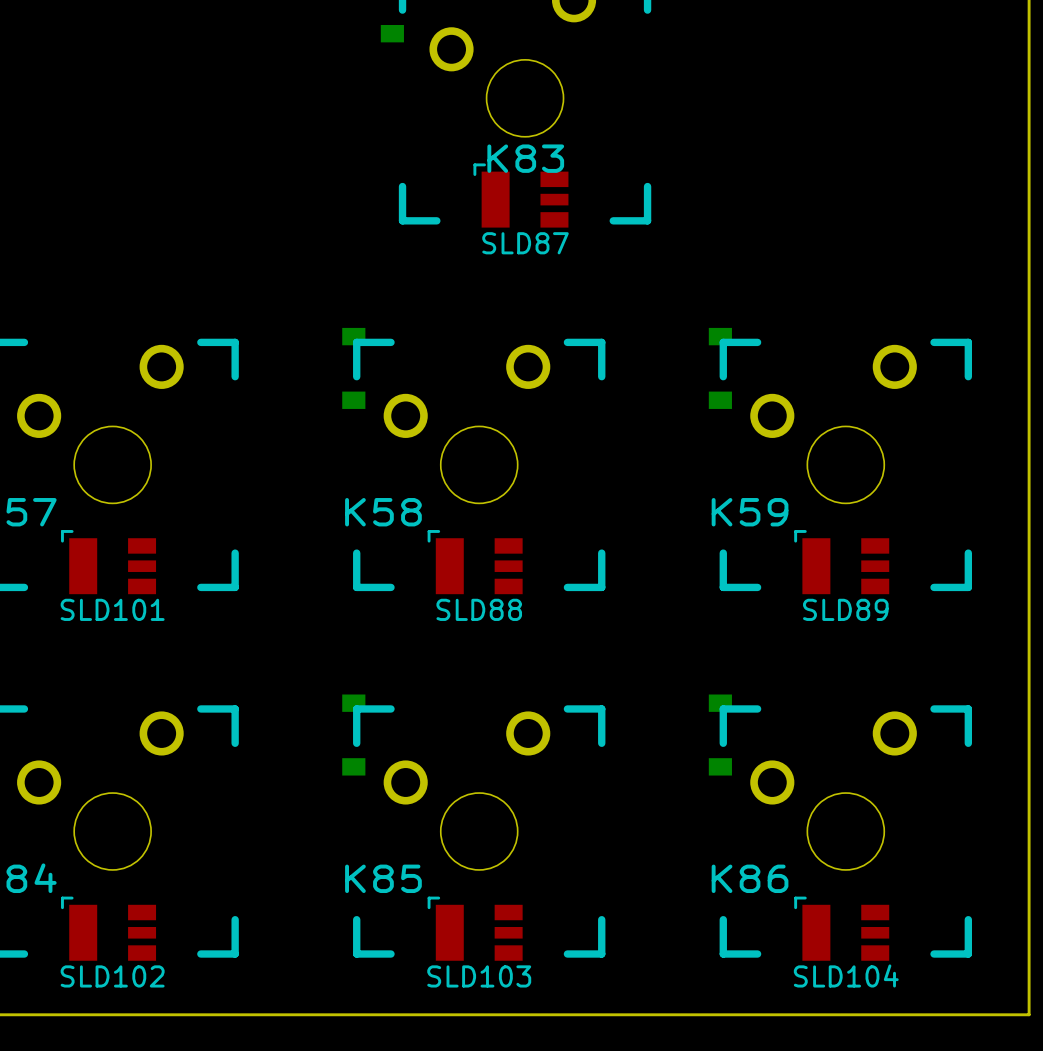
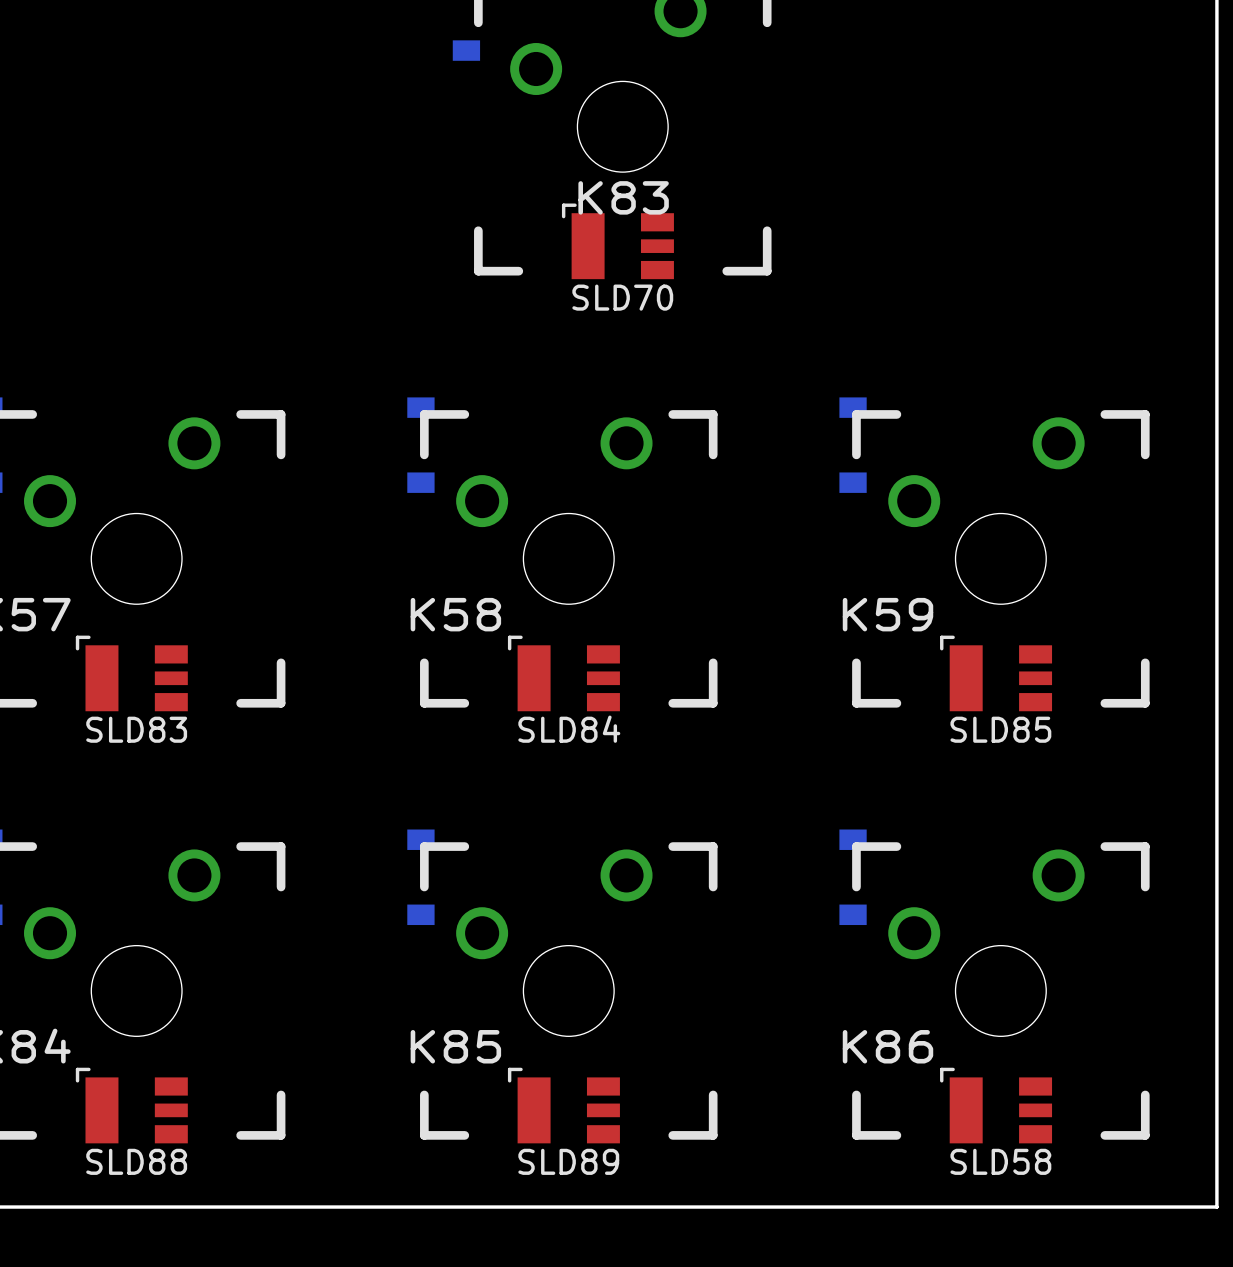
SLD87 name: SLD87 (525, 243) -> SLD70 (622, 297)
SLD101 name: SLD101 (112, 609) -> SLD83 (136, 729)
SLD88 name: SLD88 (479, 609) -> SLD84 (569, 729)
SLD89 name: SLD89 (845, 609) -> SLD85 (1000, 729)
SLD104 name: SLD104 (846, 975) -> SLD58 (1000, 1161)
SLD102 name: SLD102 (112, 976) -> SLD88 (136, 1161)
SLD103 name: SLD103 (479, 976) -> SLD89 (568, 1161)

